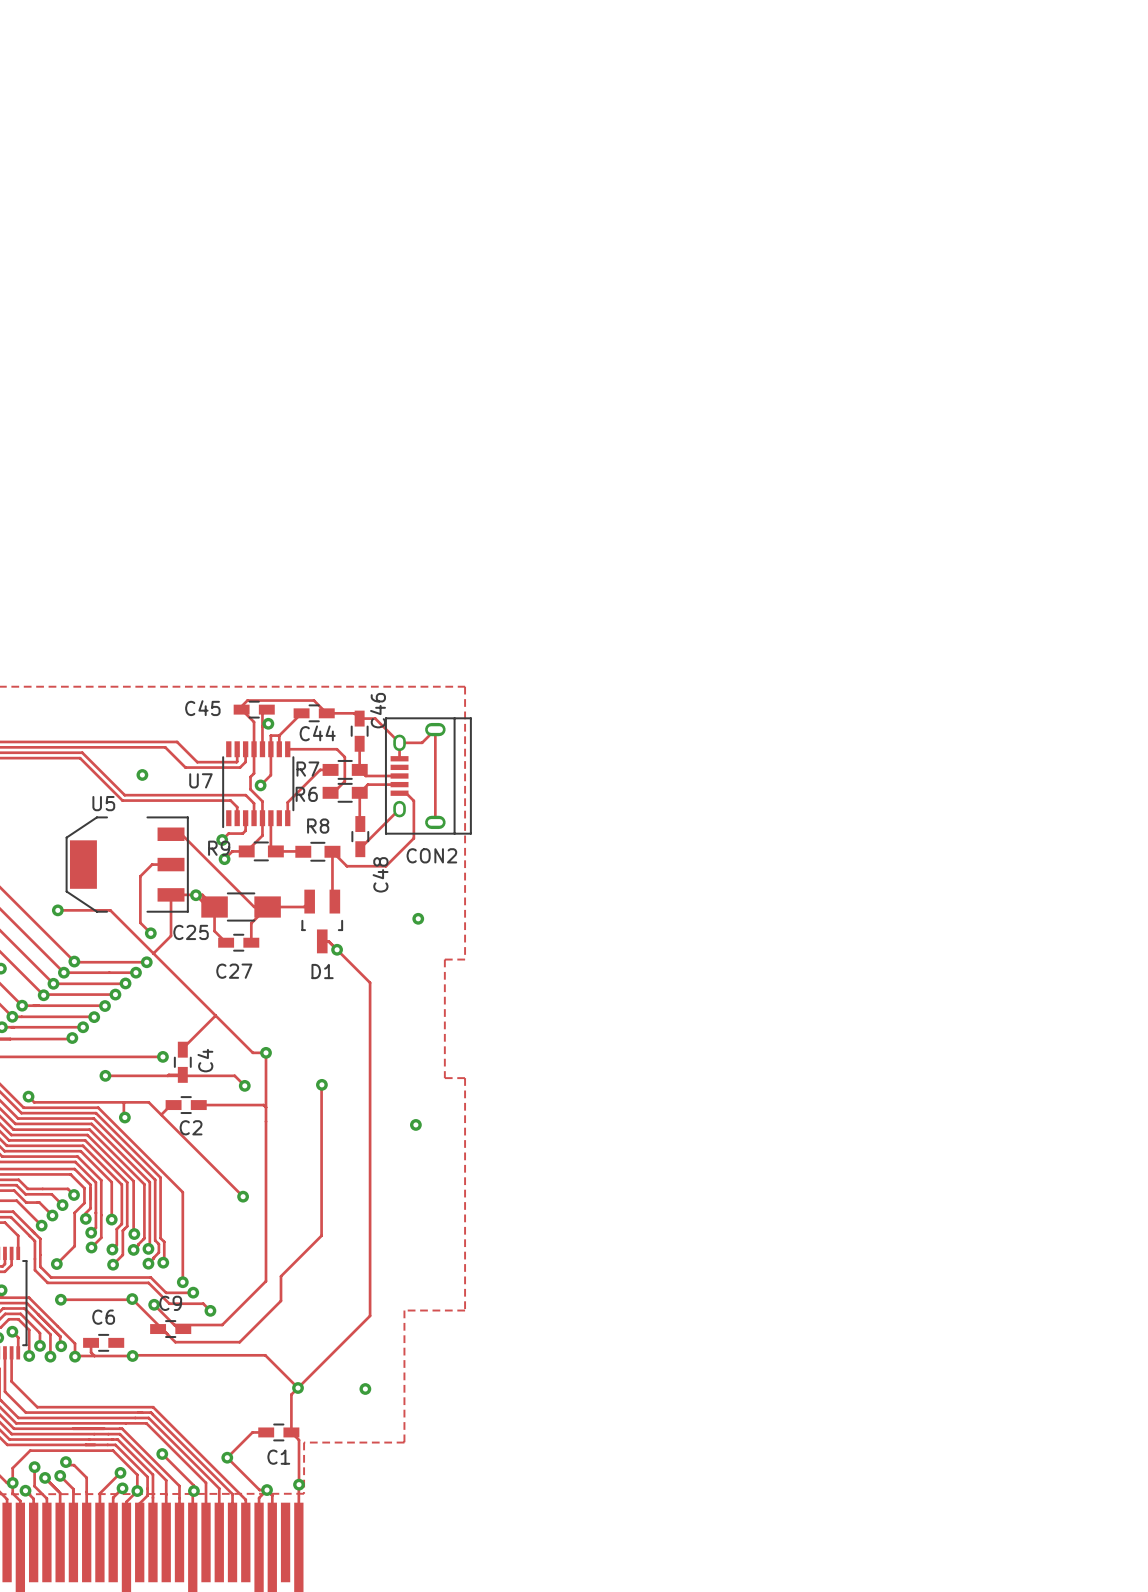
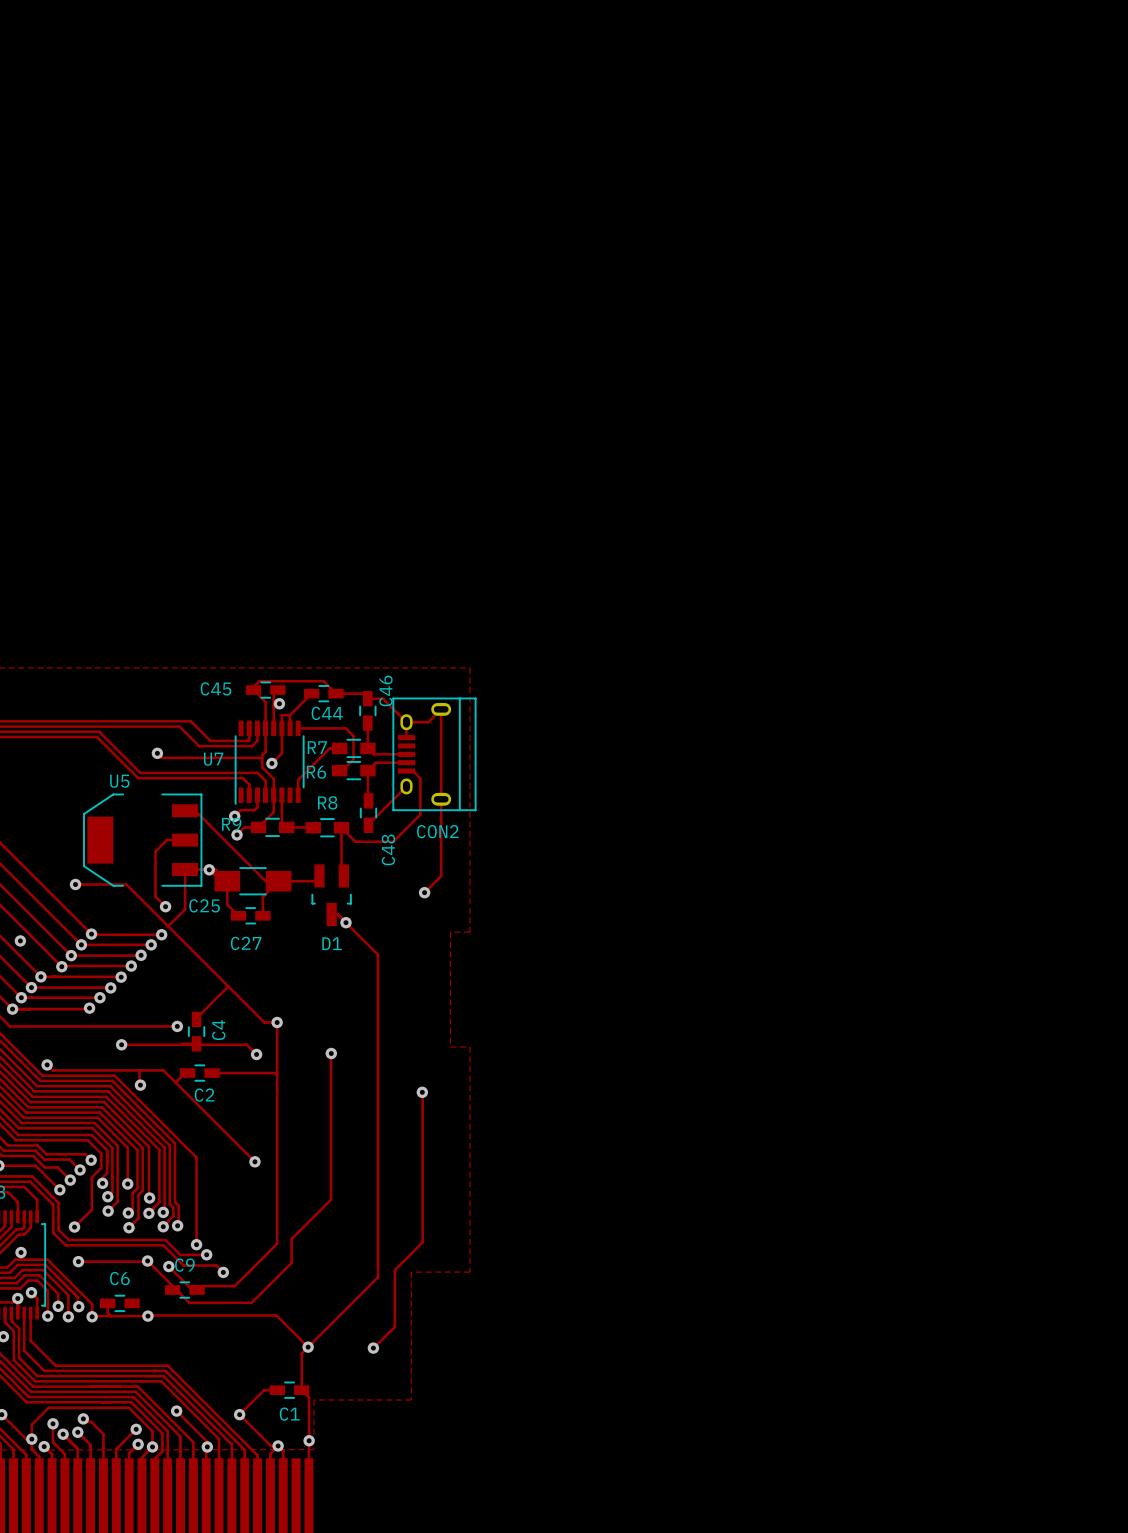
track: none -> (157, 753) (162, 757) (262, 757)
track: none -> (441, 799) (441, 876) (424, 892)
track: none -> (422, 1092) (422, 1242) (394, 1270) (394, 1326) (373, 1348)

